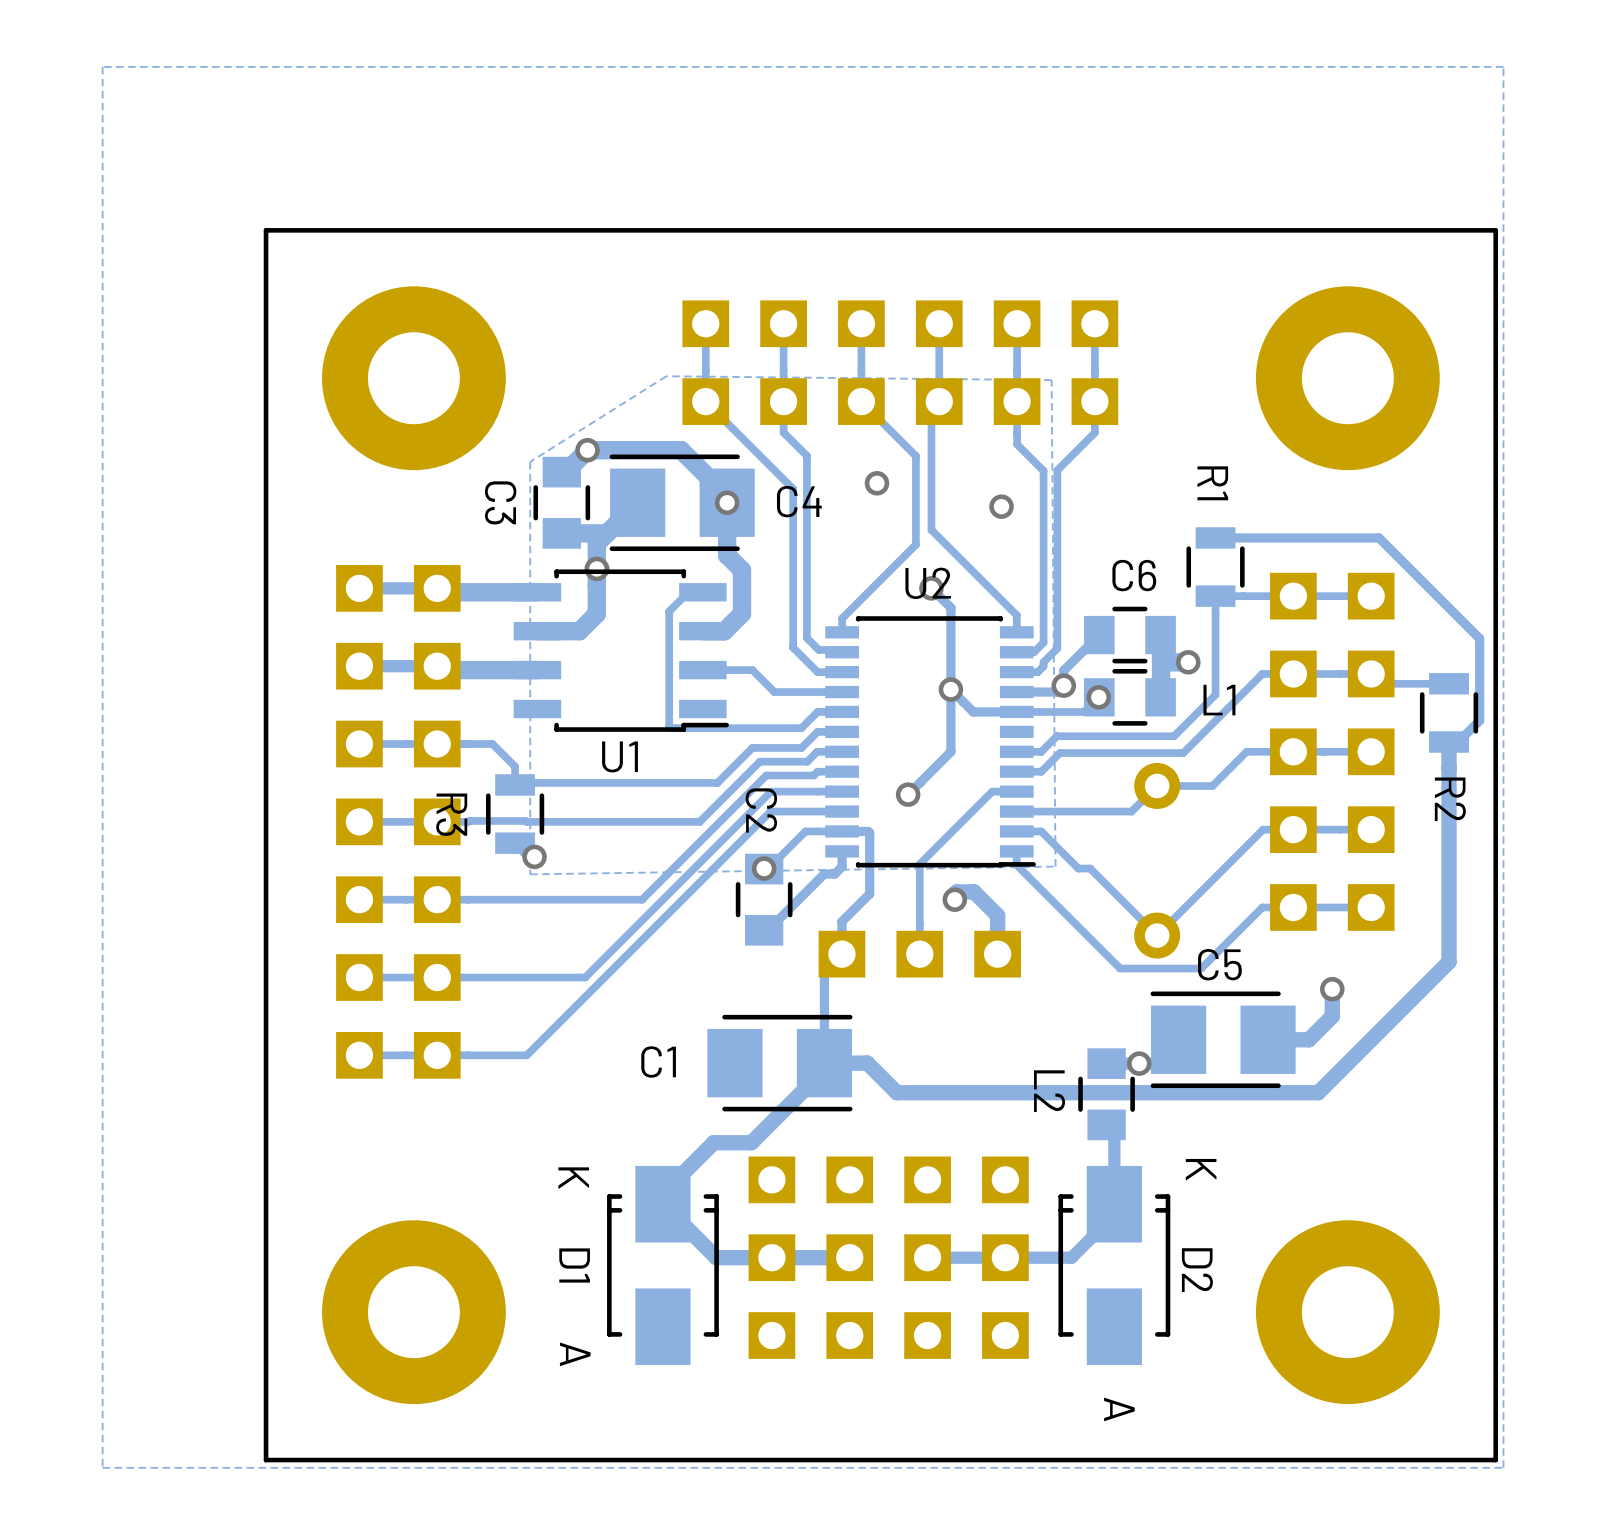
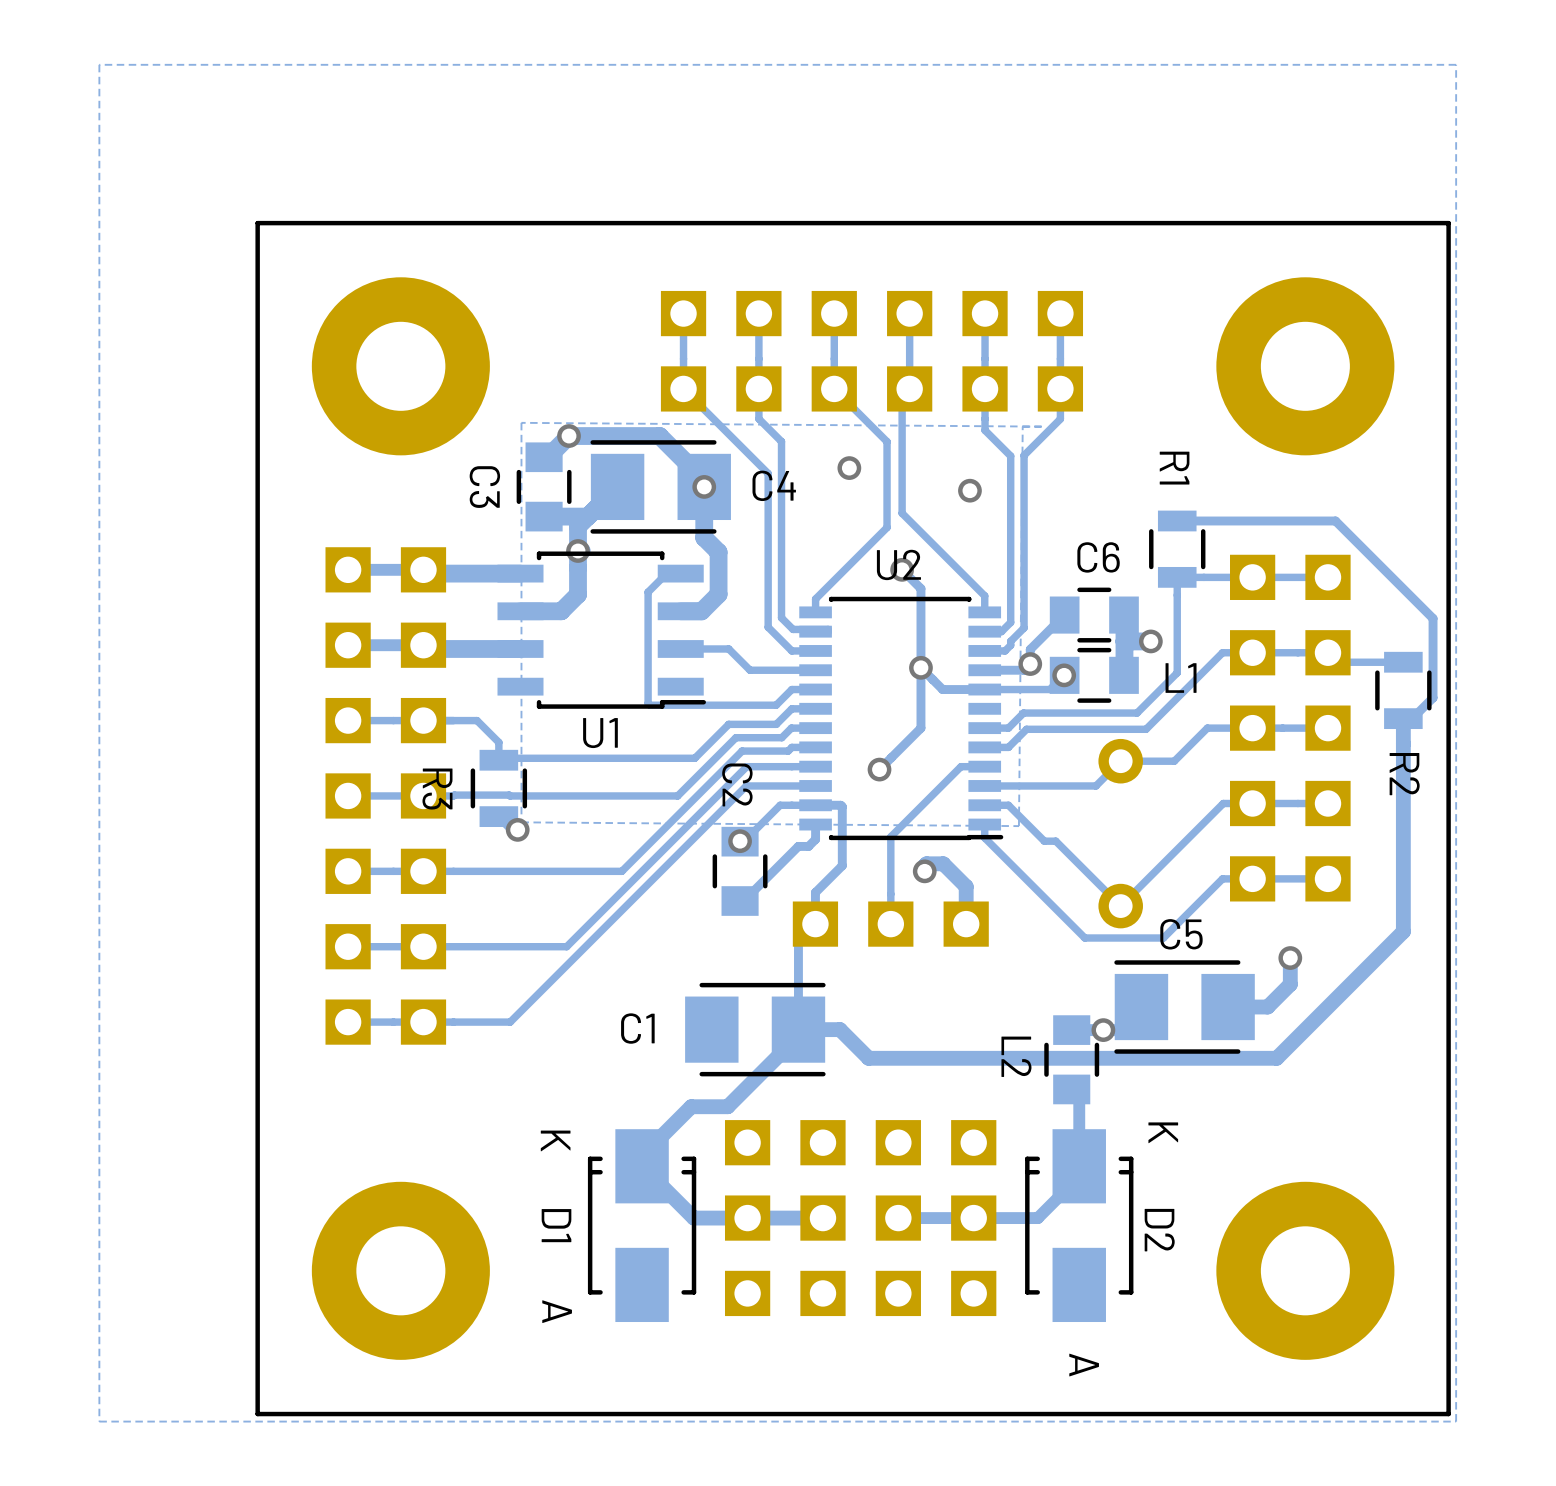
zone outline: (666, 376) (1051, 380) (1055, 866) (530, 874) (530, 461) (666, 376) -> (521, 422) (1041, 426) (1022, 426) (1018, 826) (521, 822) (521, 422)

